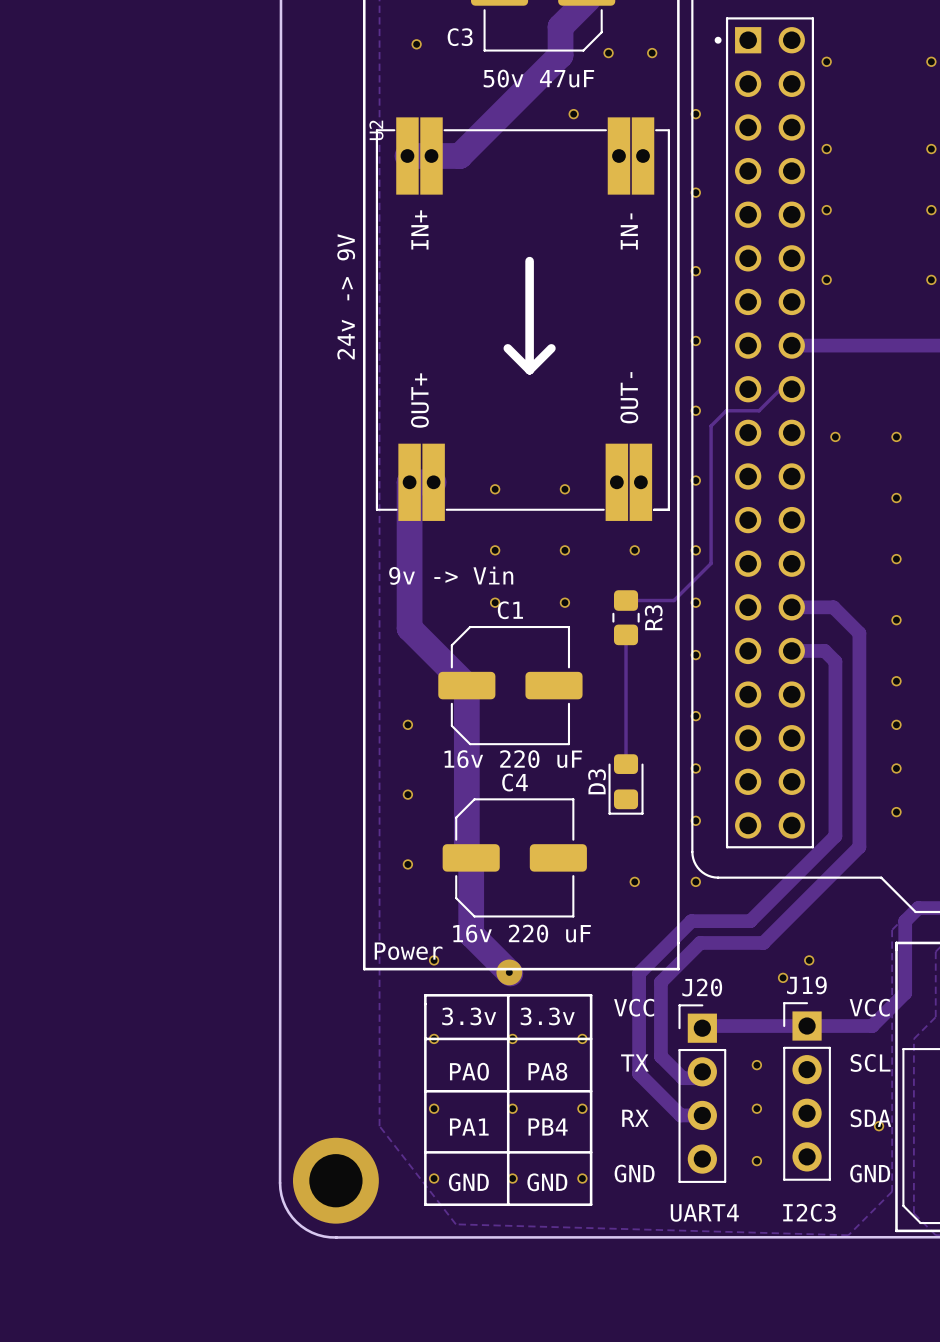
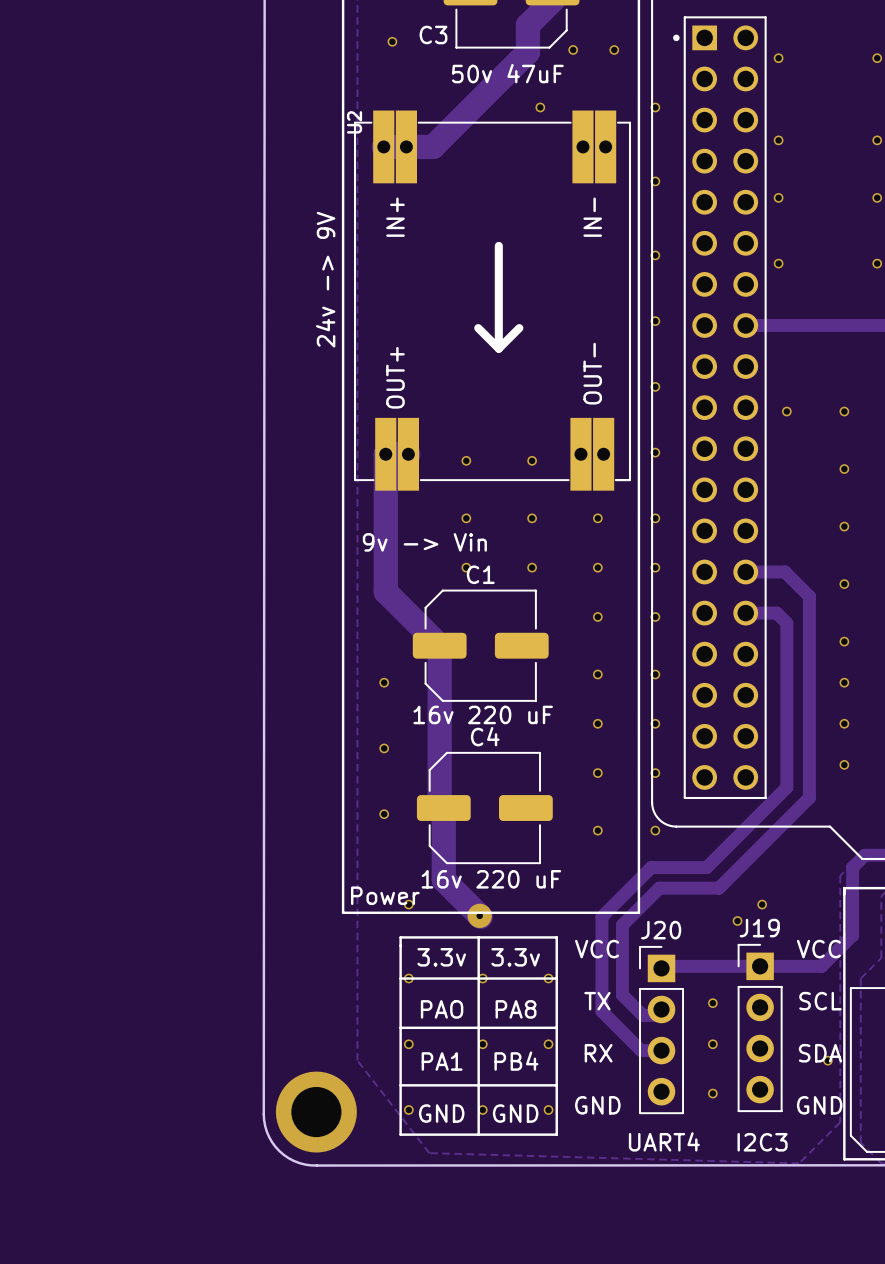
track: (791, 389) (780, 389) (759, 410) (726, 410) (711, 426) (711, 563) (674, 600) (626, 600) -> none
via: none -> (597, 567)
R3: (626, 617) -> none
track: (626, 634) (626, 764) -> none
via: none -> (597, 616)
via: none -> (597, 674)
via: none -> (597, 723)
D3: (626, 784) -> none
via: none -> (597, 773)

